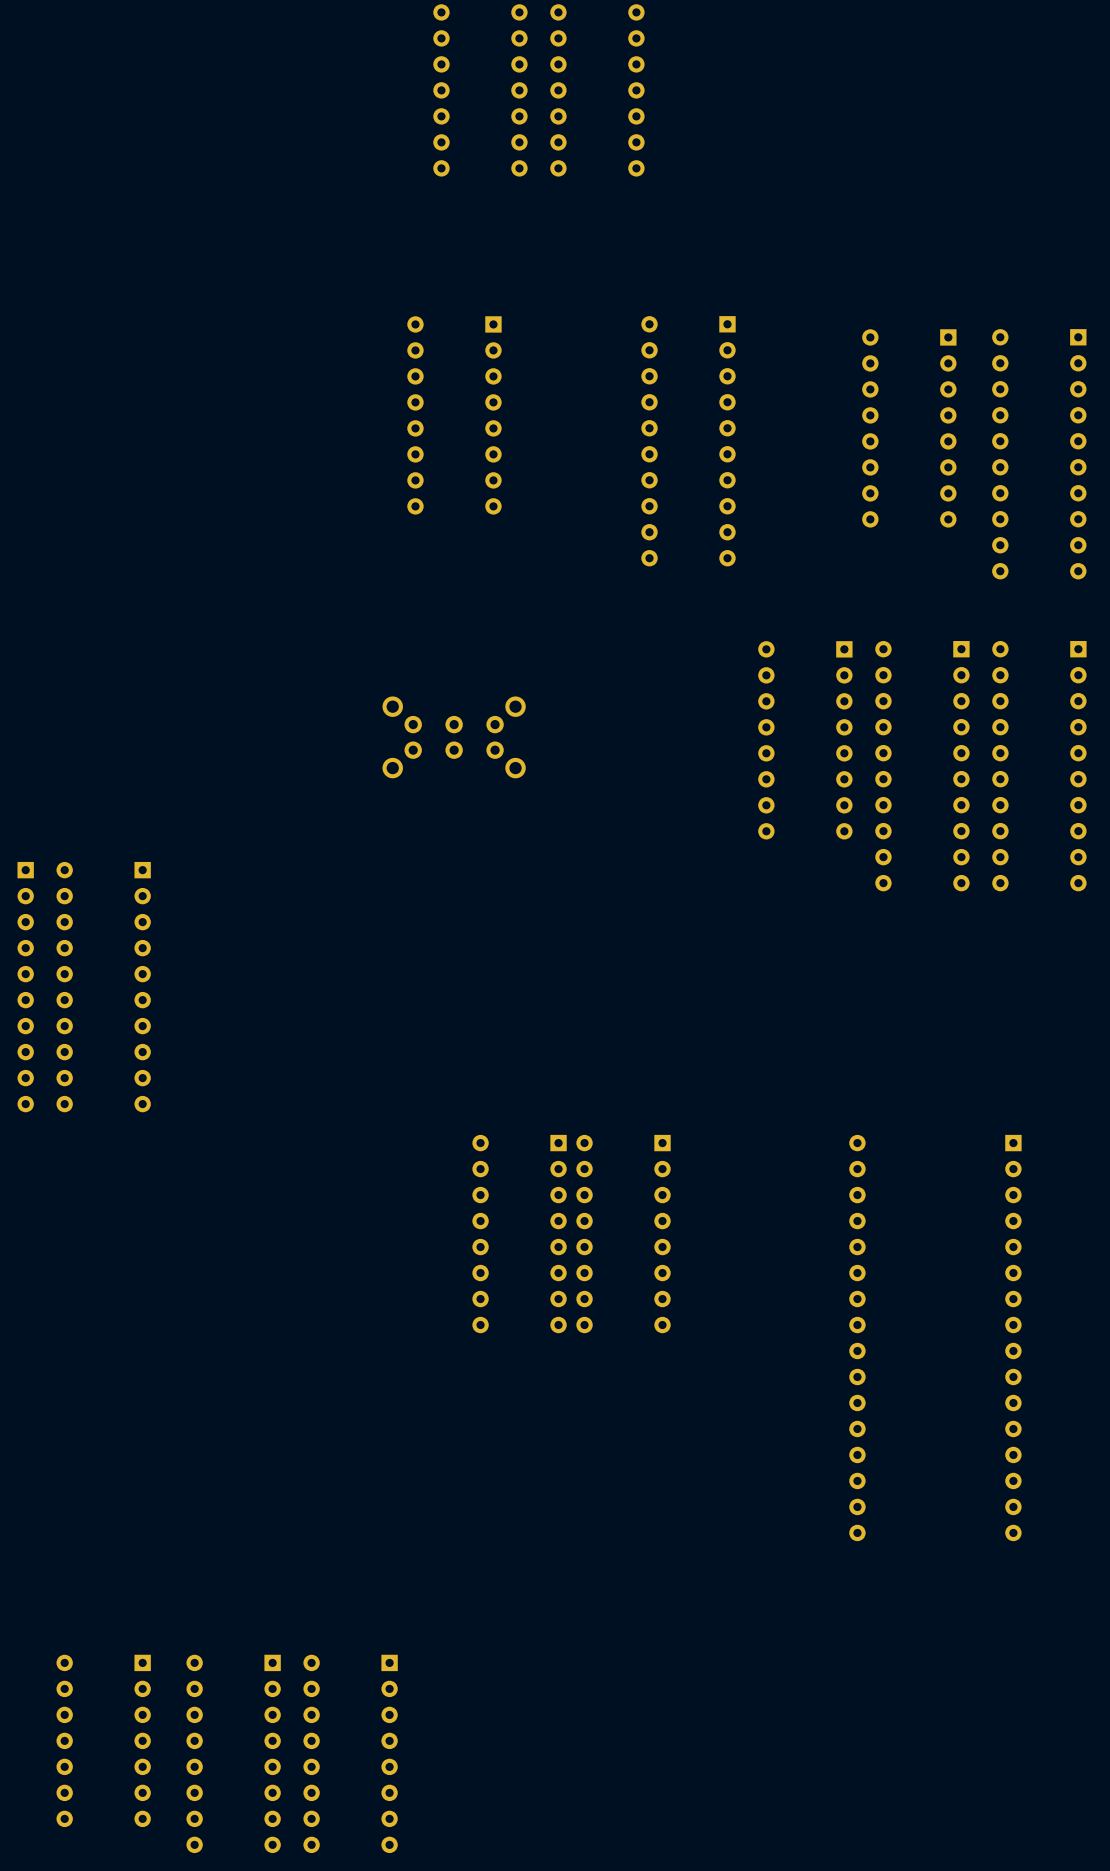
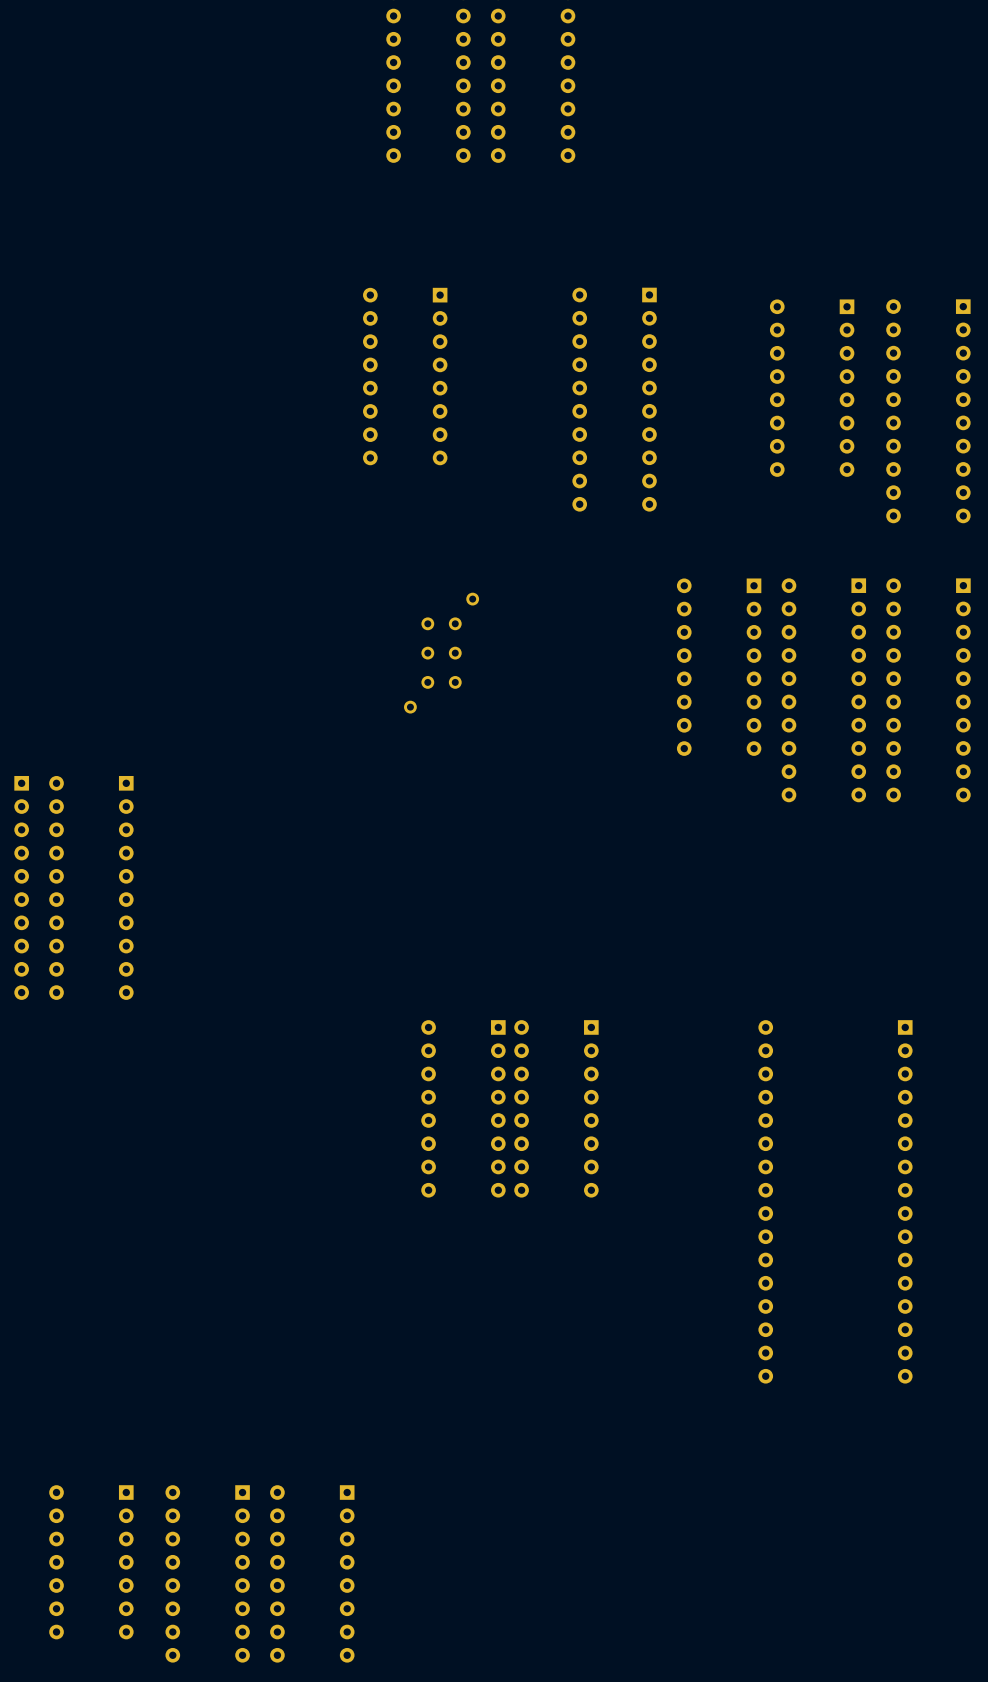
part: none -> (441, 653)
part: (454, 737) -> none

